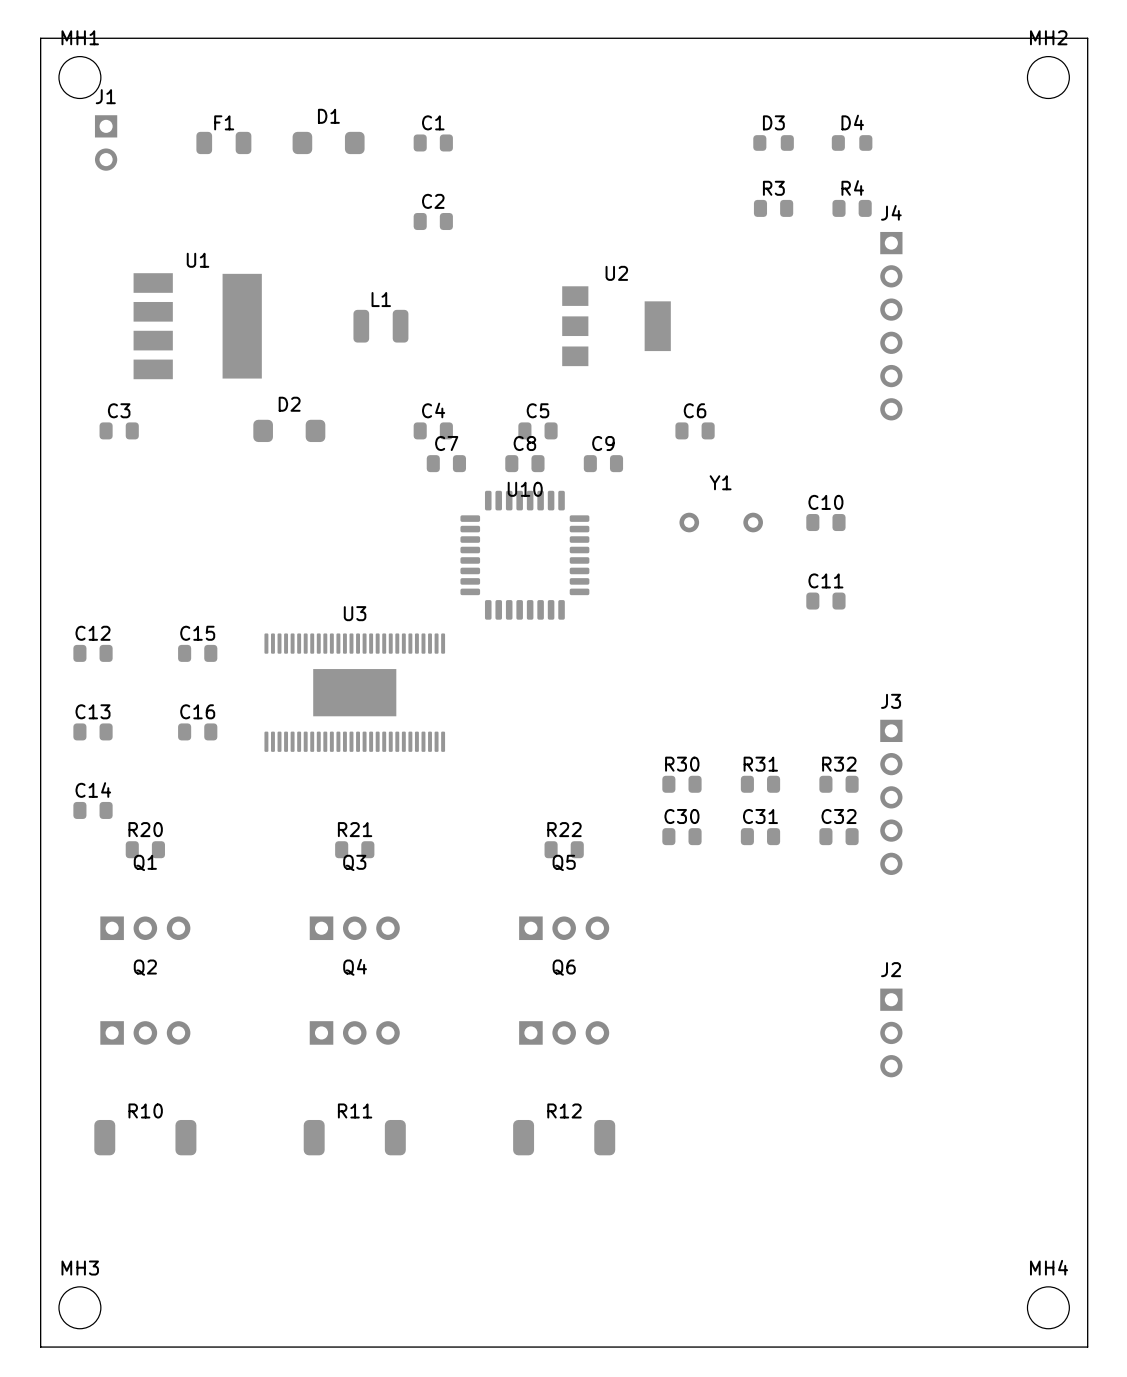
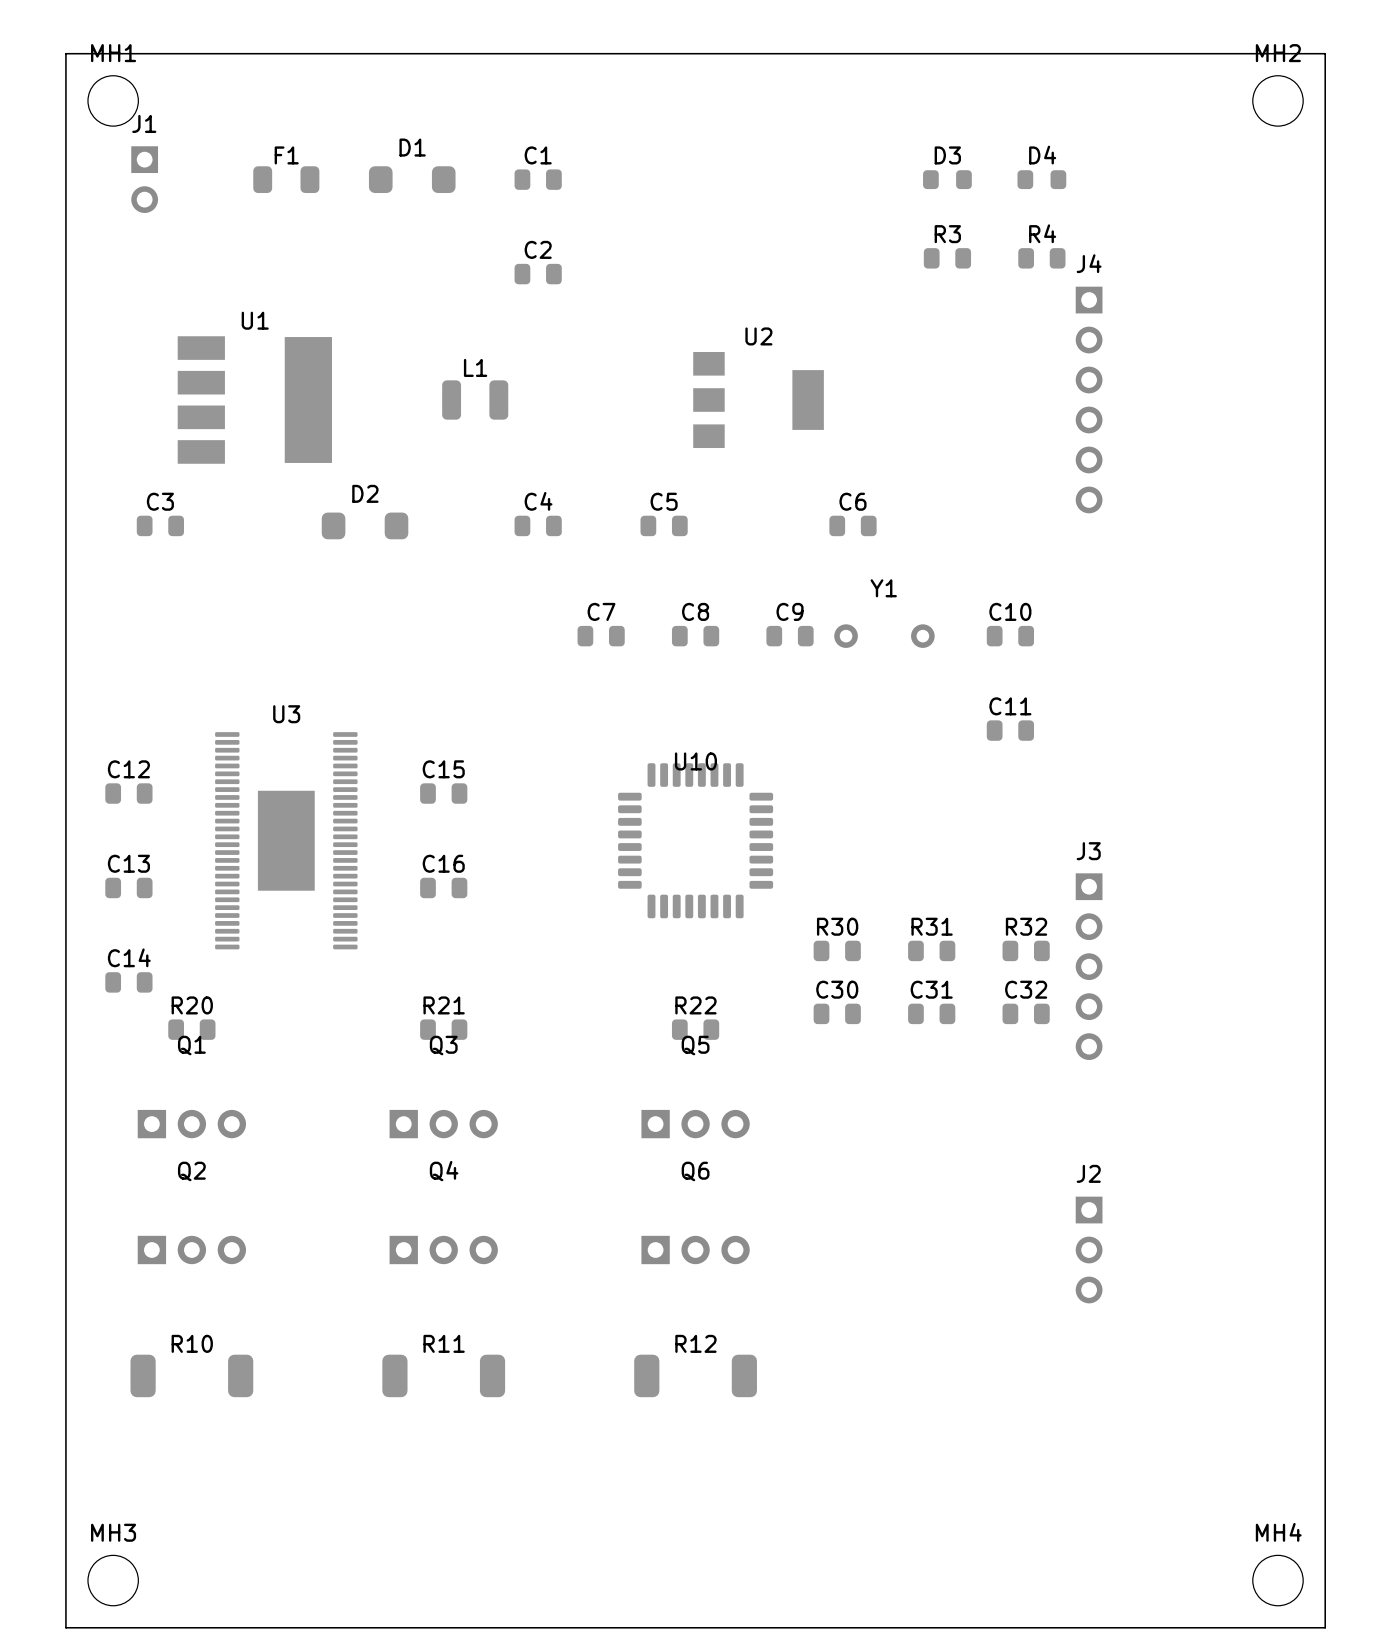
C7 position: (446, 463) -> (601, 636)
C8 position: (524, 463) -> (695, 636)
C9 position: (603, 463) -> (790, 636)
U10 position: (524, 555) -> (695, 840)
C15 position: (197, 653) -> (443, 793)
U3 rotation: 0° (354, 692) -> 90° clockwise (286, 840)
U3 position: (354, 692) -> (286, 840)
C16 position: (197, 731) -> (443, 887)

